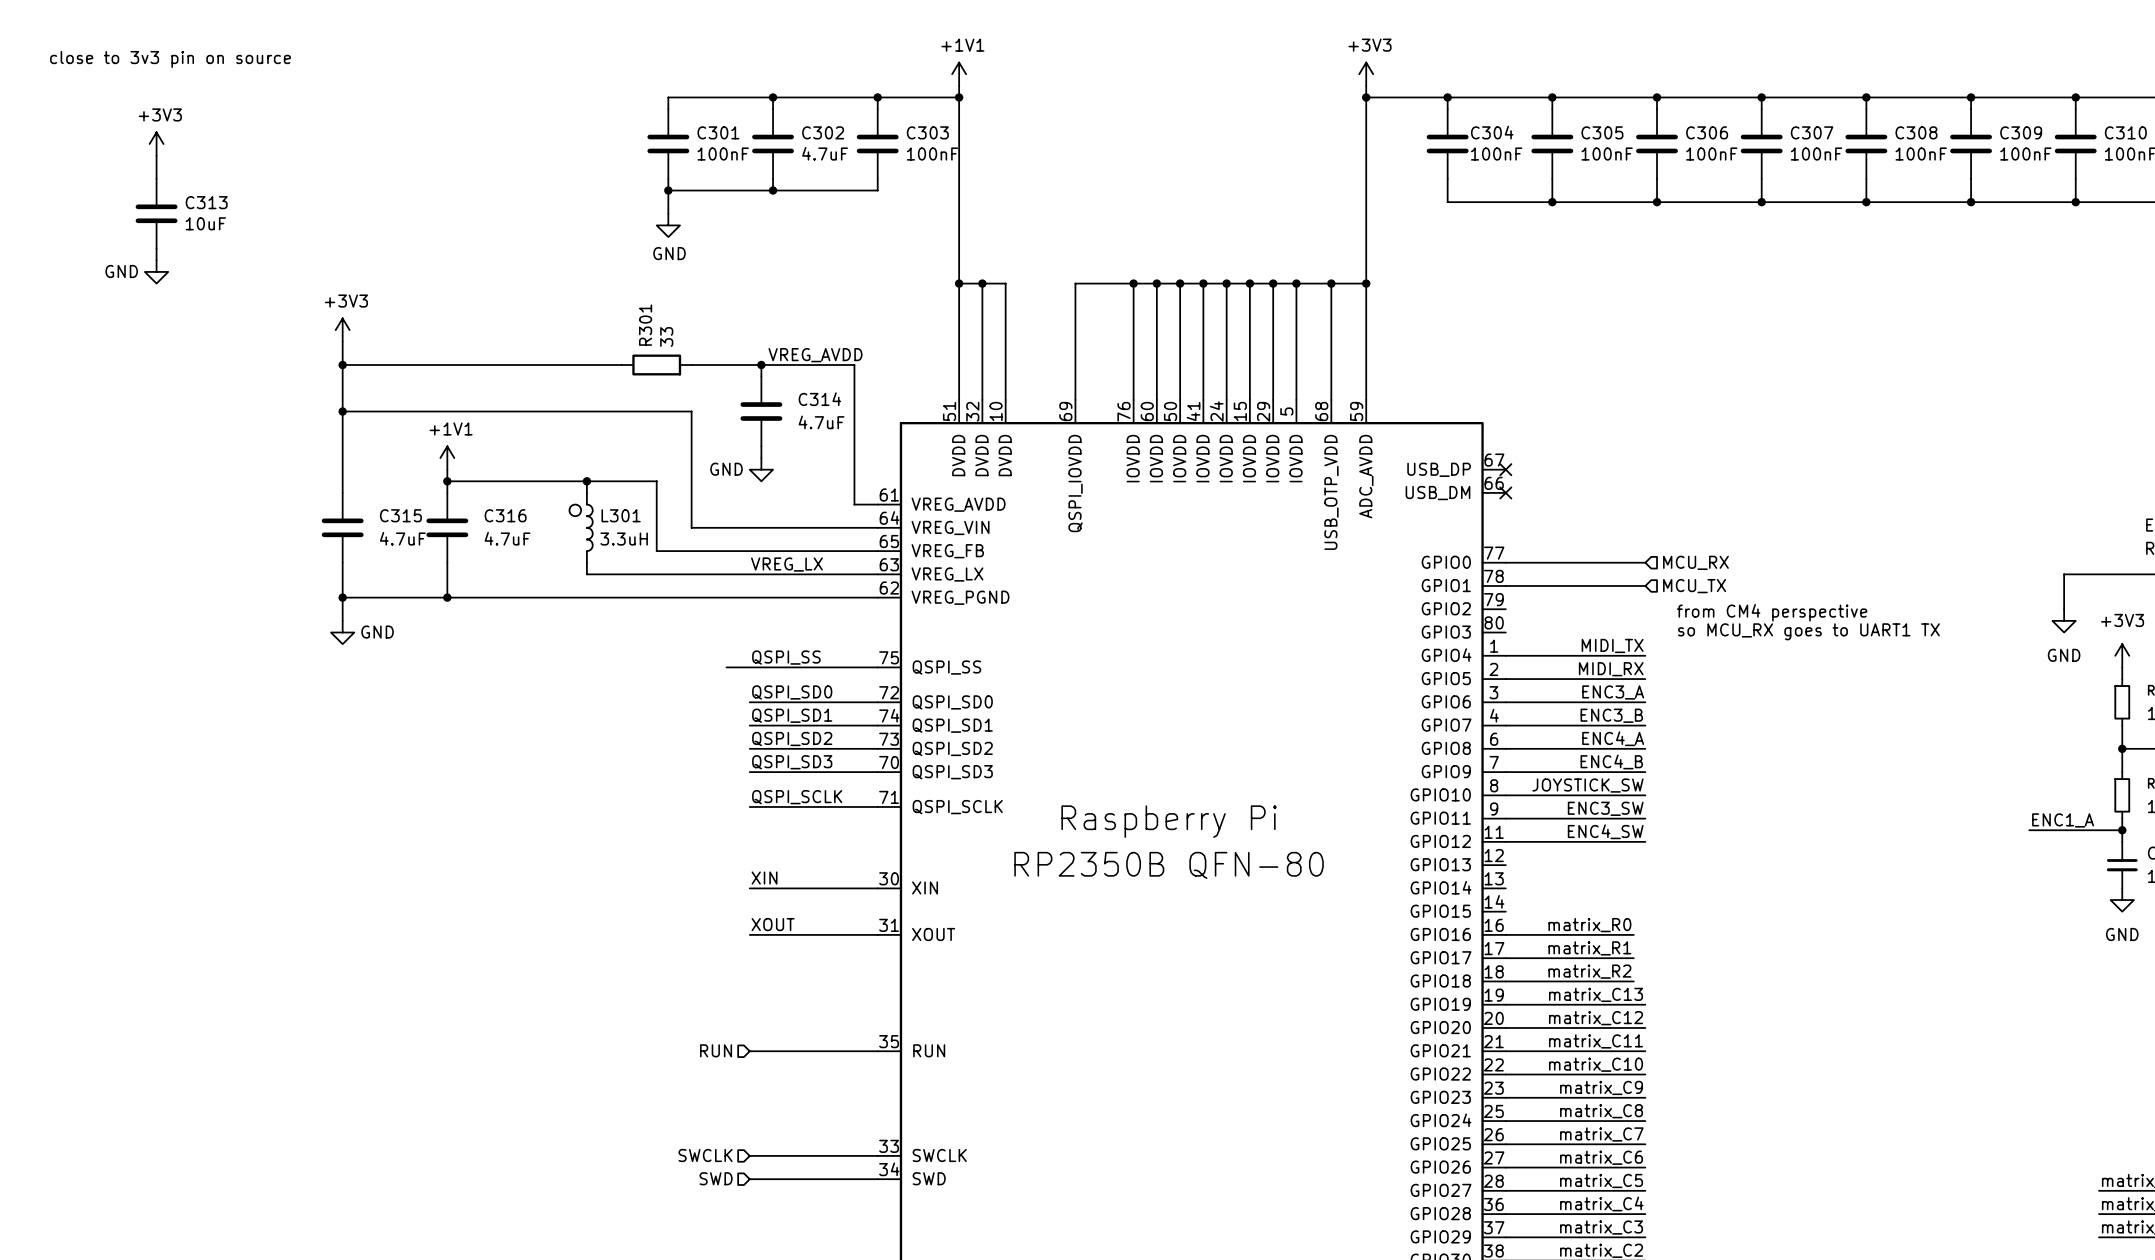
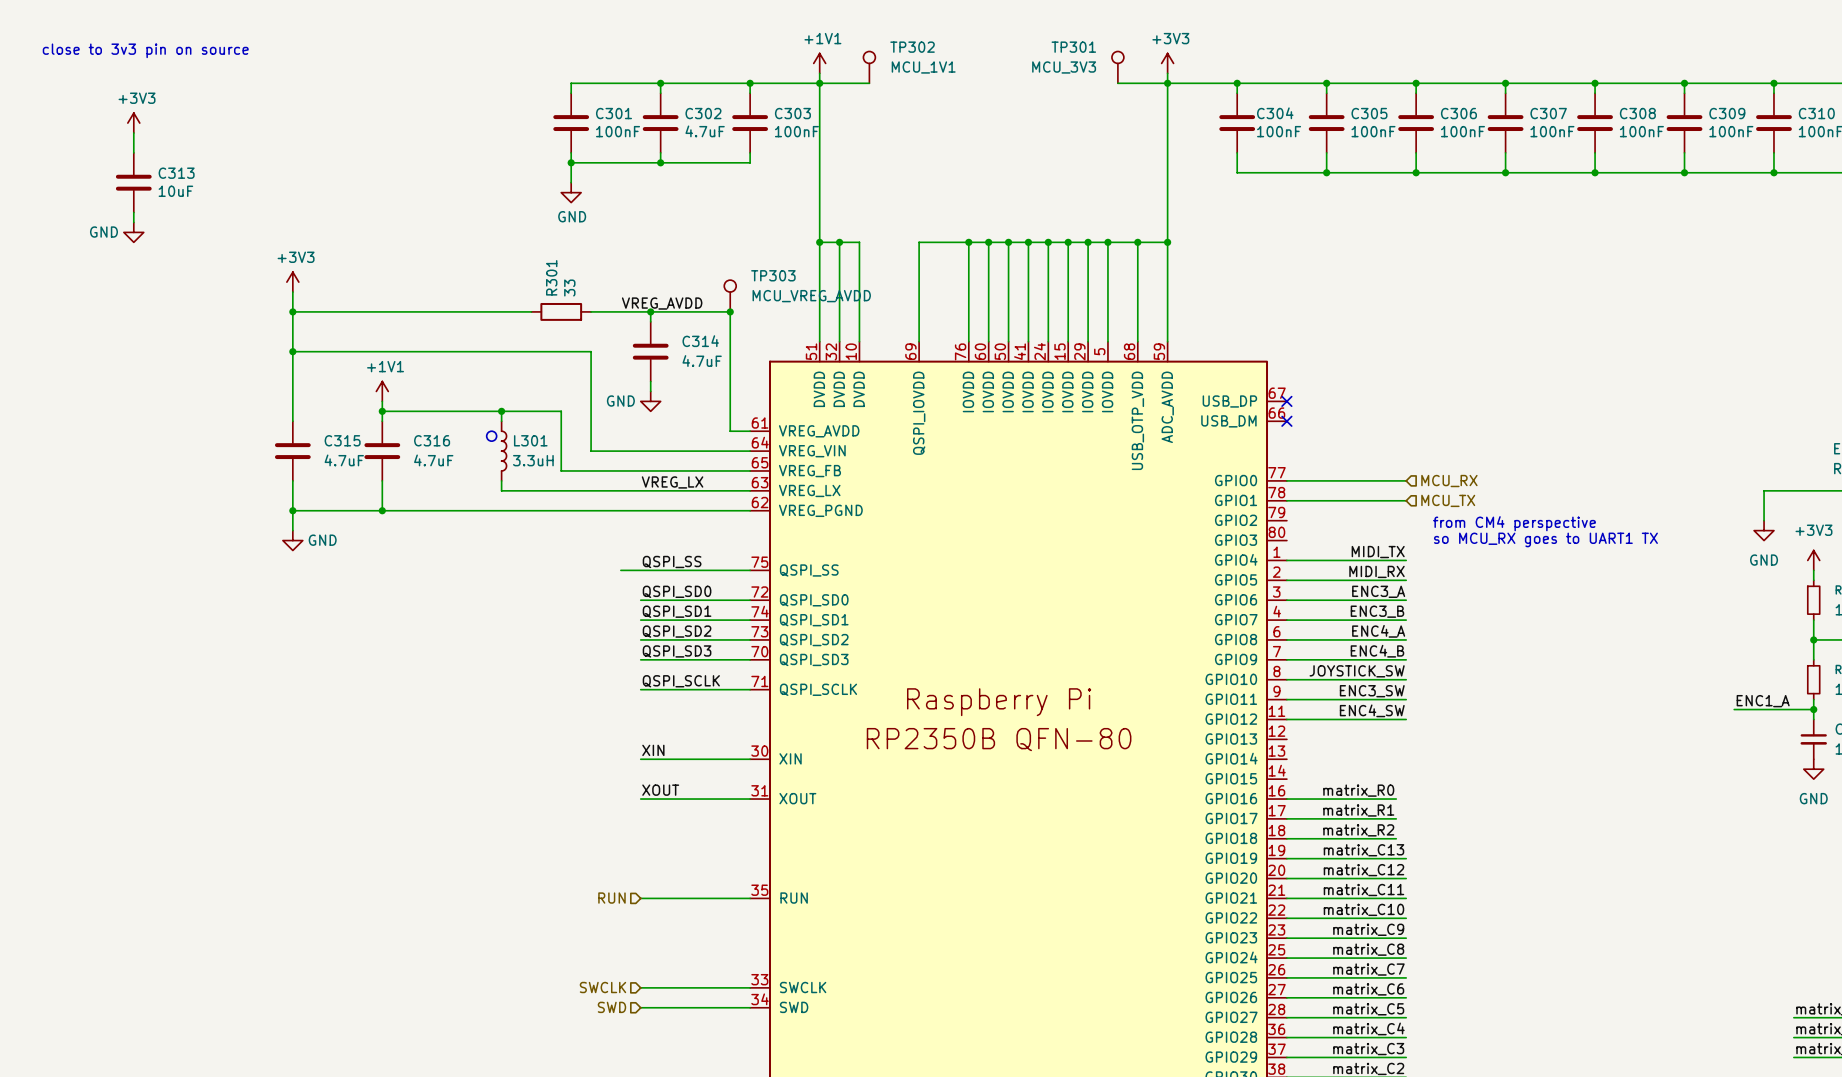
TP302: none -> MCU_1V1 (869, 67)
TP301: none -> MCU_3V3 (1117, 67)
wire: none -> (819, 83) (869, 83)
wire: none -> (1117, 83) (1167, 83)
TP303: none -> MCU_VREG_AVDD (730, 296)
label position: VREG_AVDD (815, 355) -> VREG_AVDD (662, 303)
junction: none -> (730, 311)

